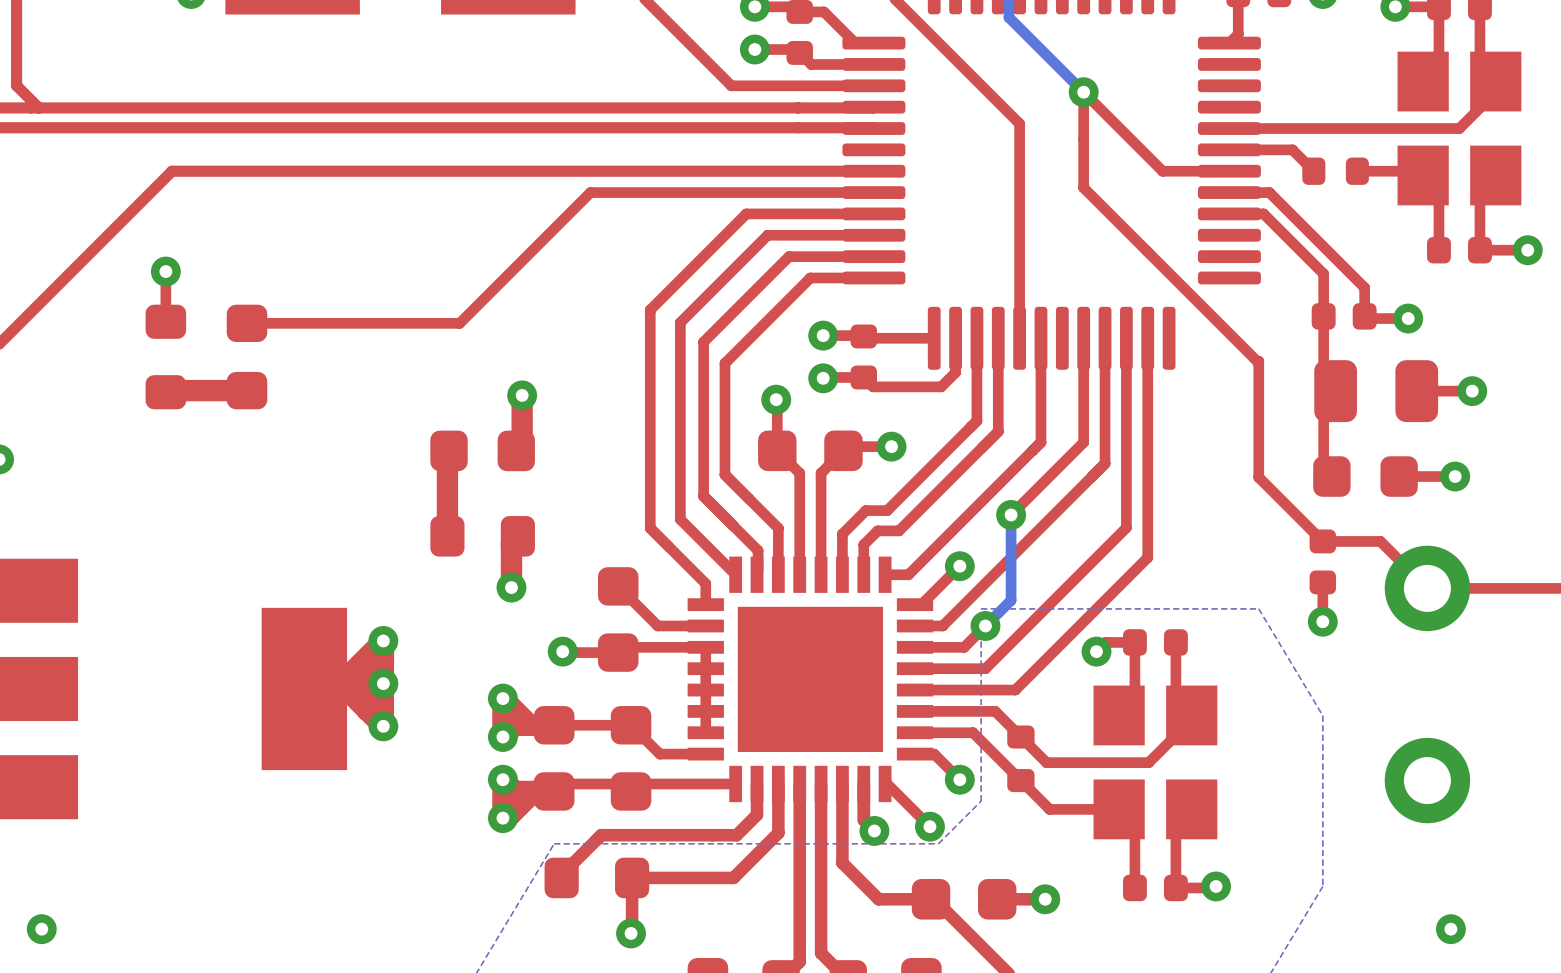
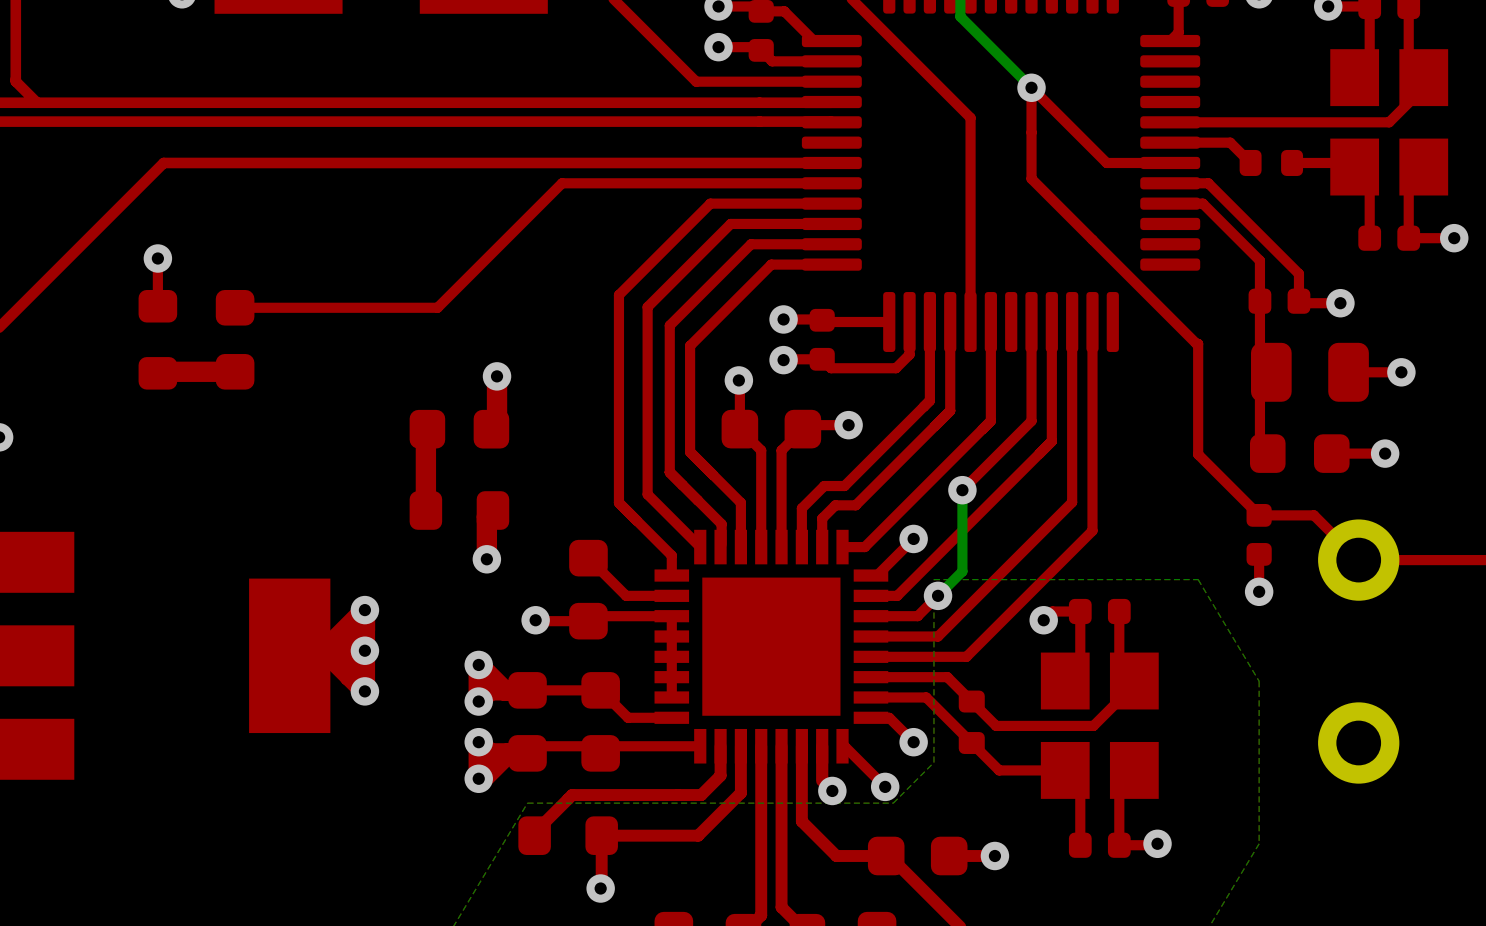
via: (41, 929) -> none
via: (1450, 929) -> none

